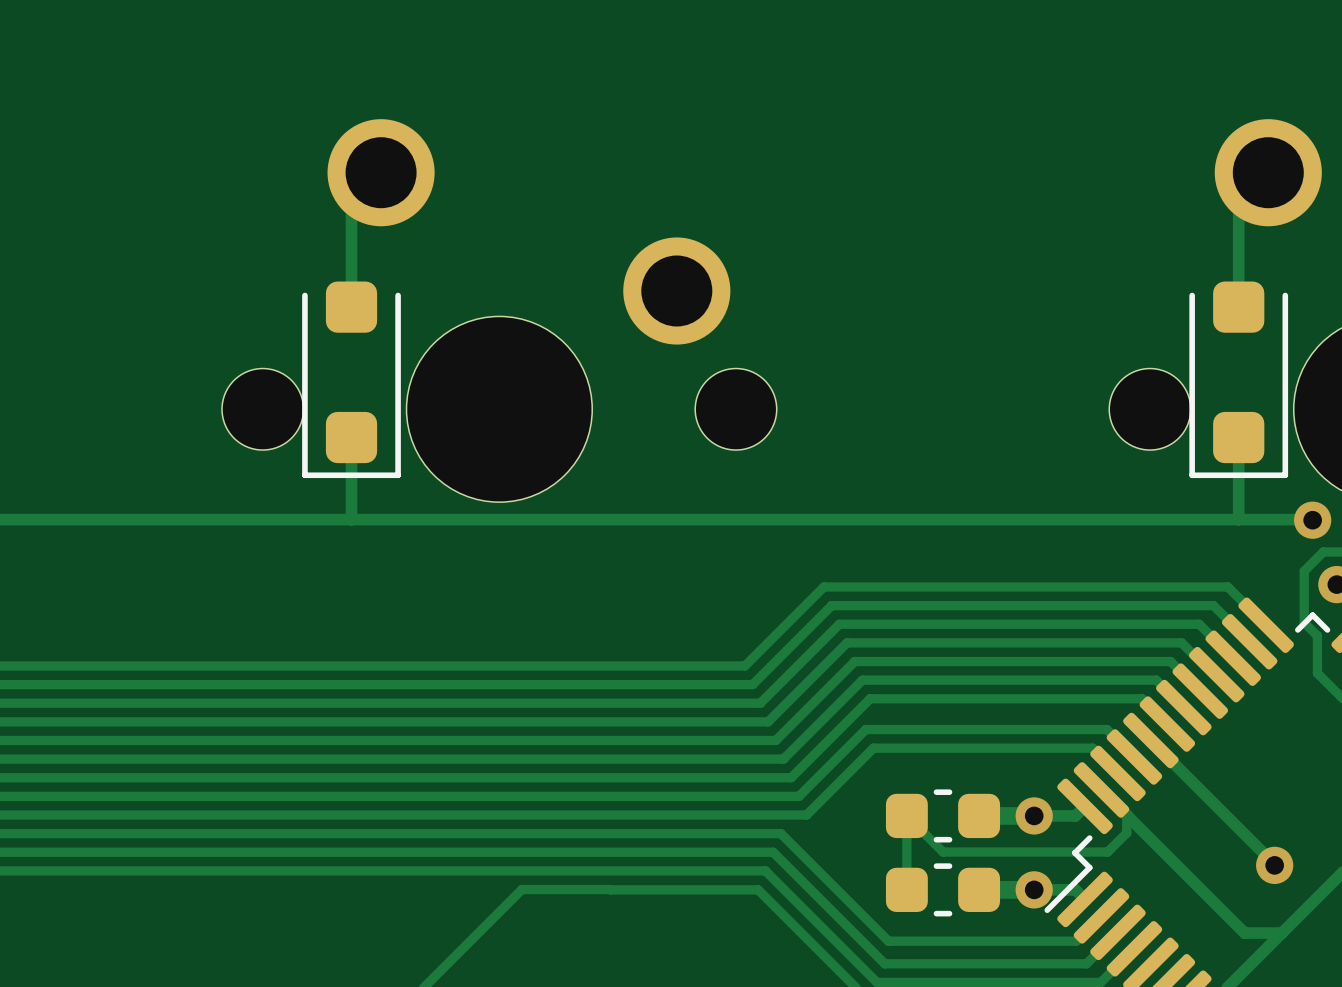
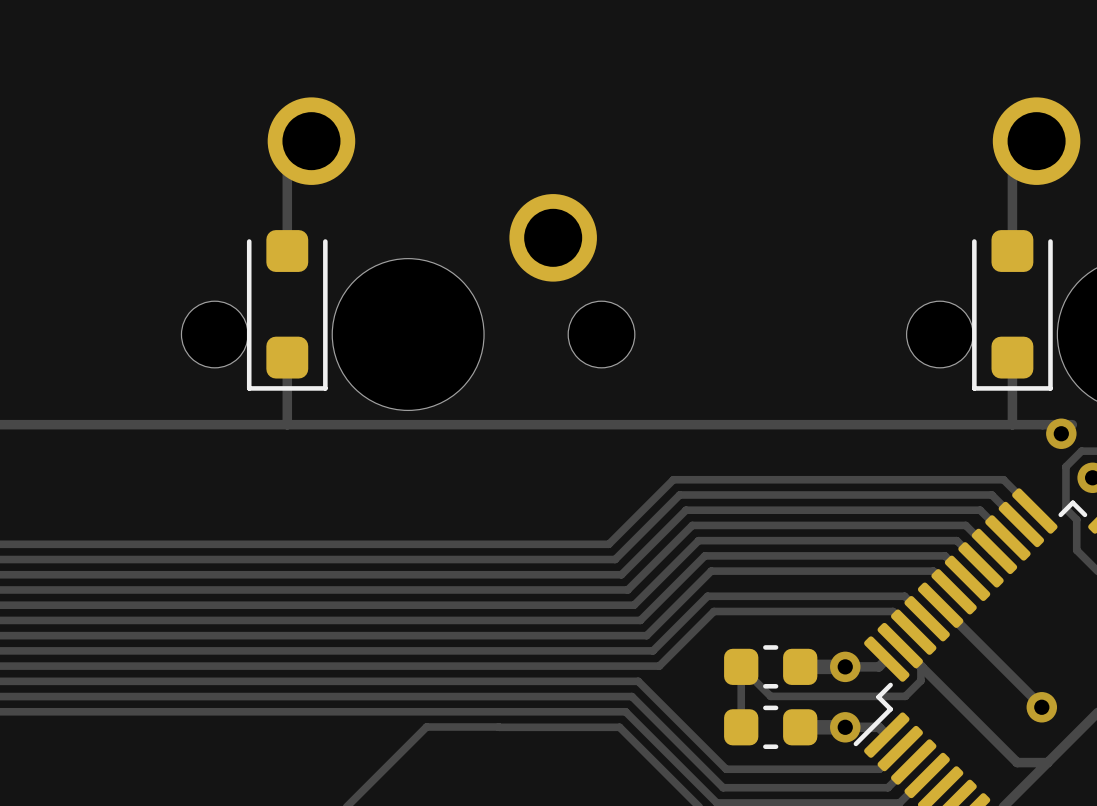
via position: (1312, 520) -> (1061, 433)

